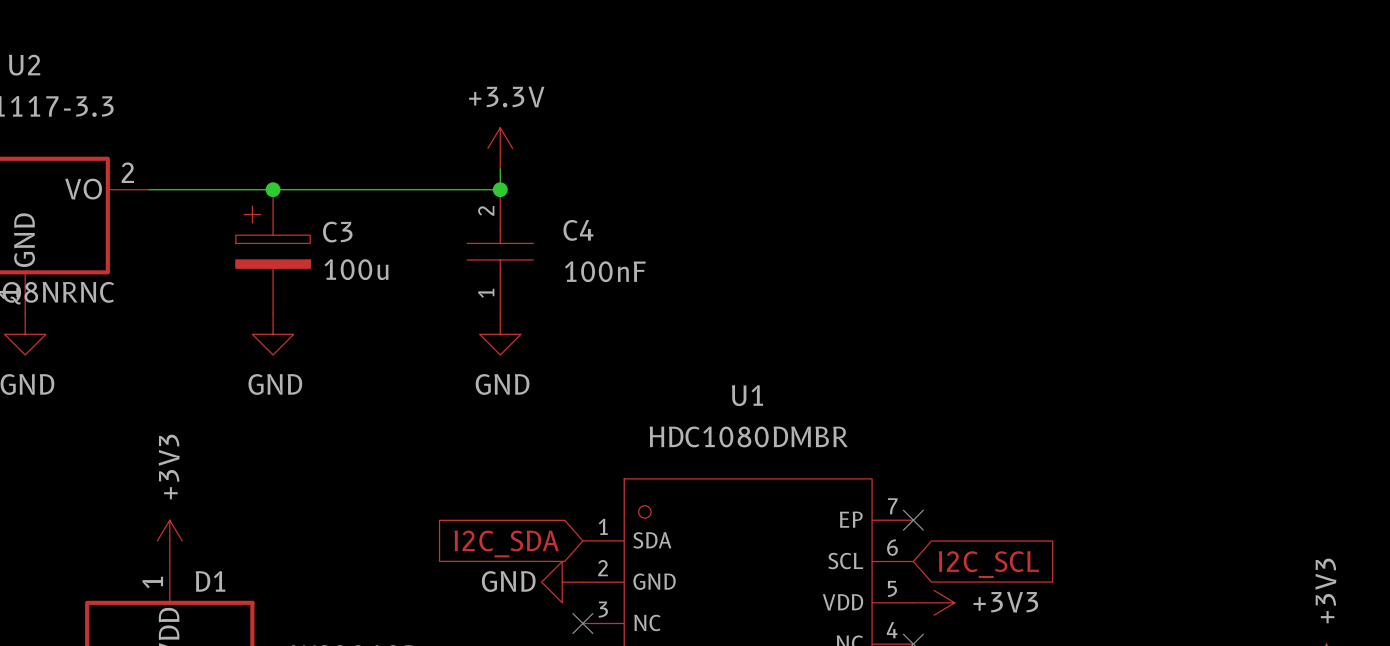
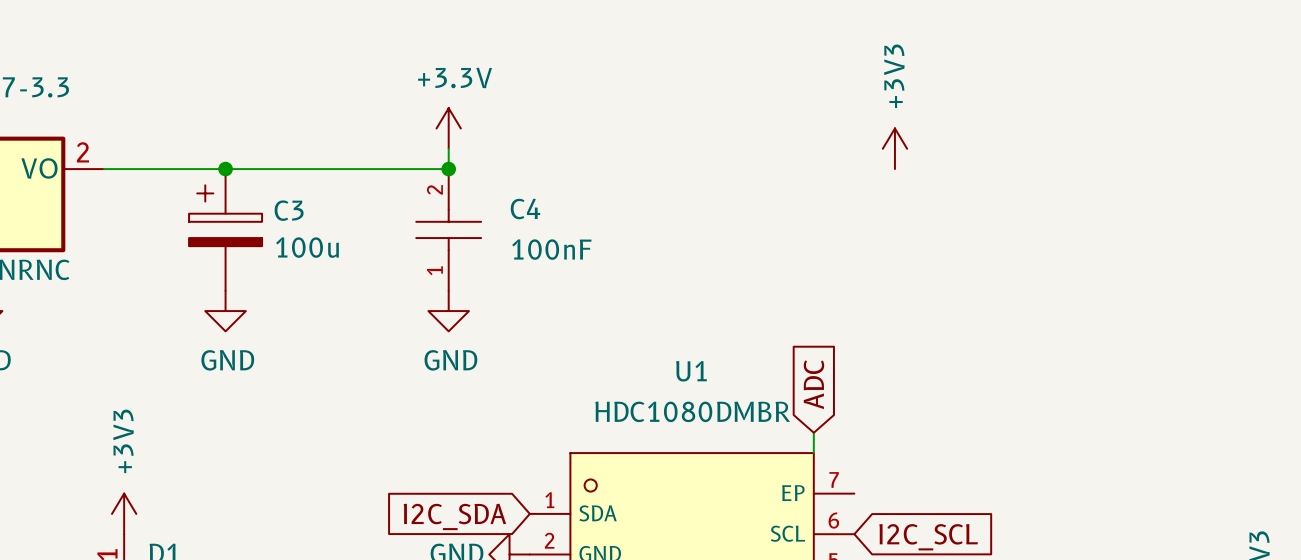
power symbol: none -> +3V3 (894, 148)
global label: none -> ADC (813, 384)
wire: none -> (813, 432) (813, 453)
no-connect mark: (913, 520) -> none

